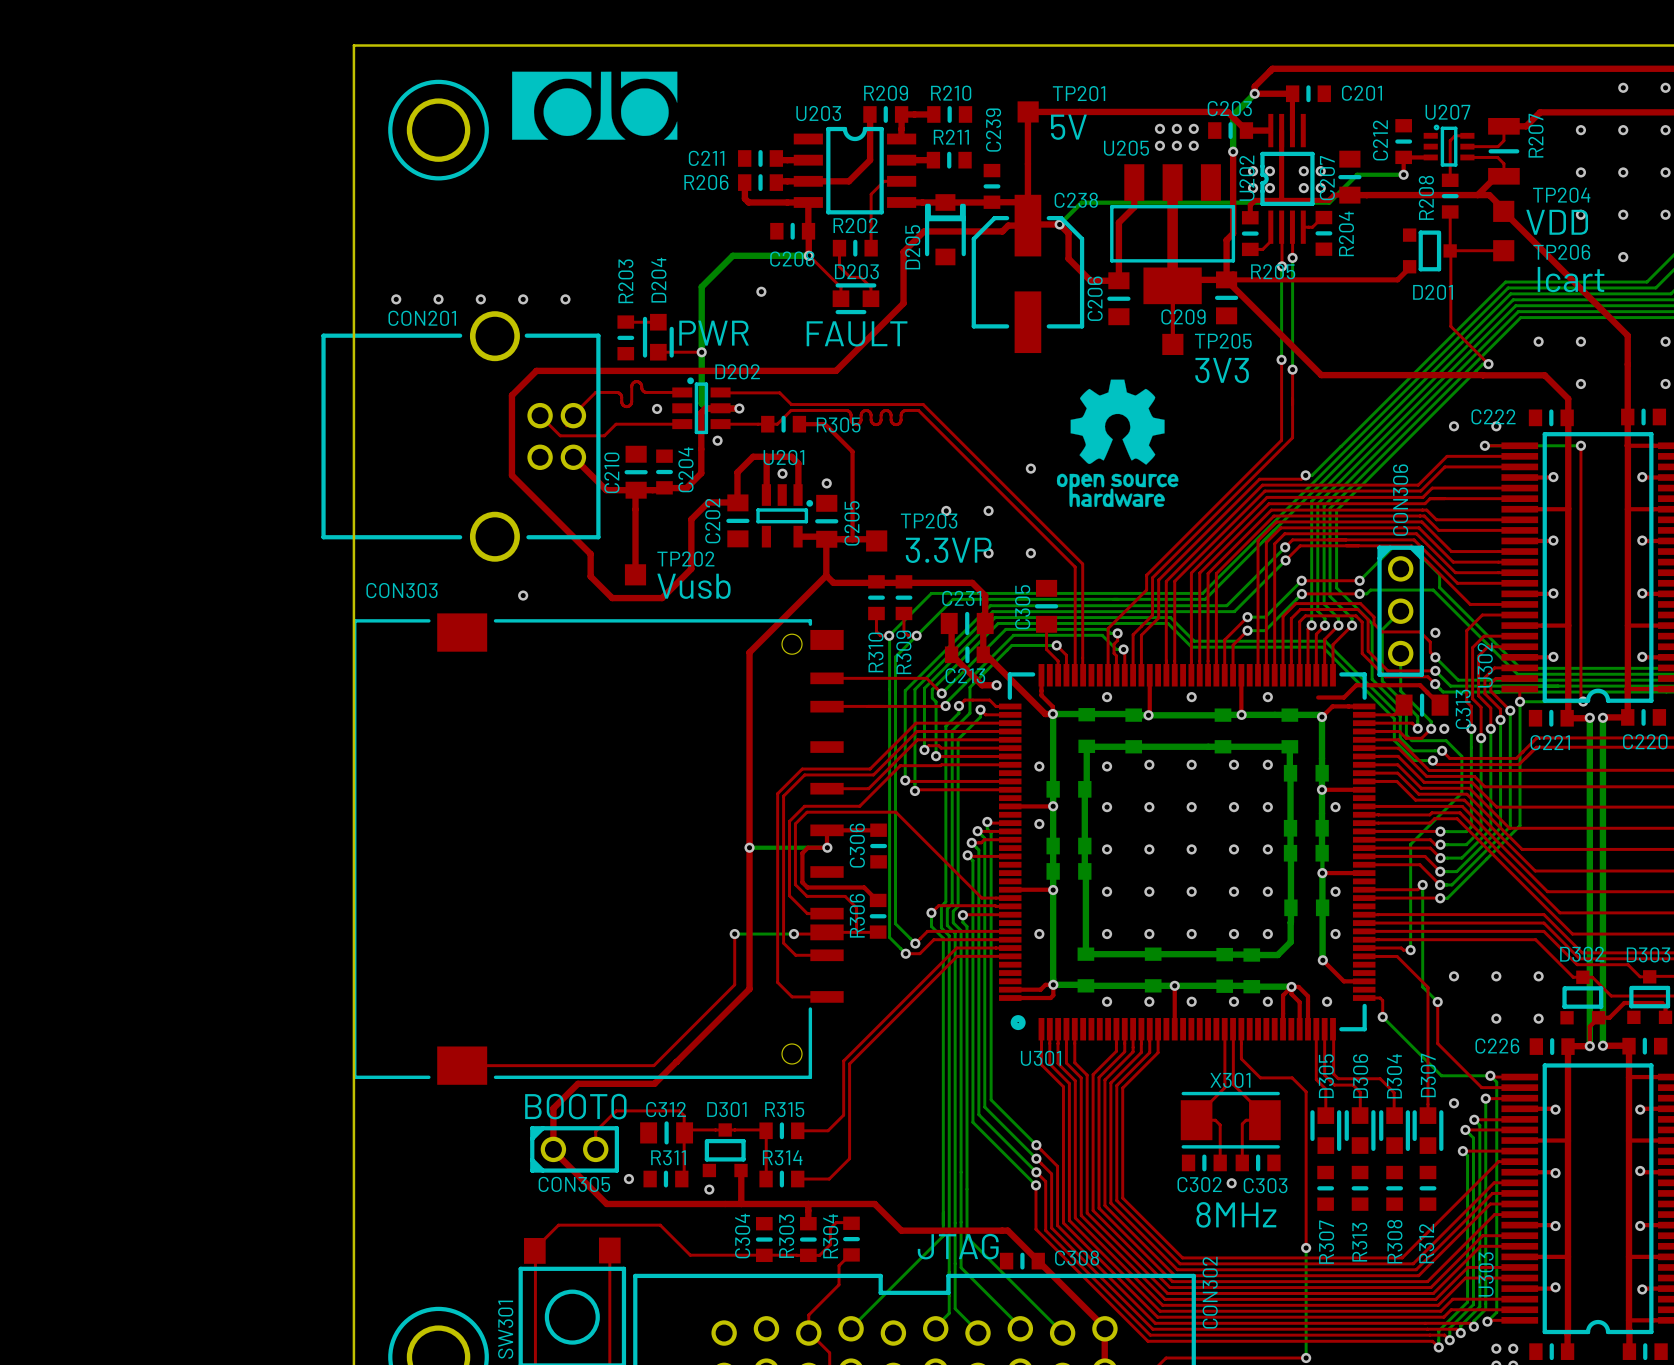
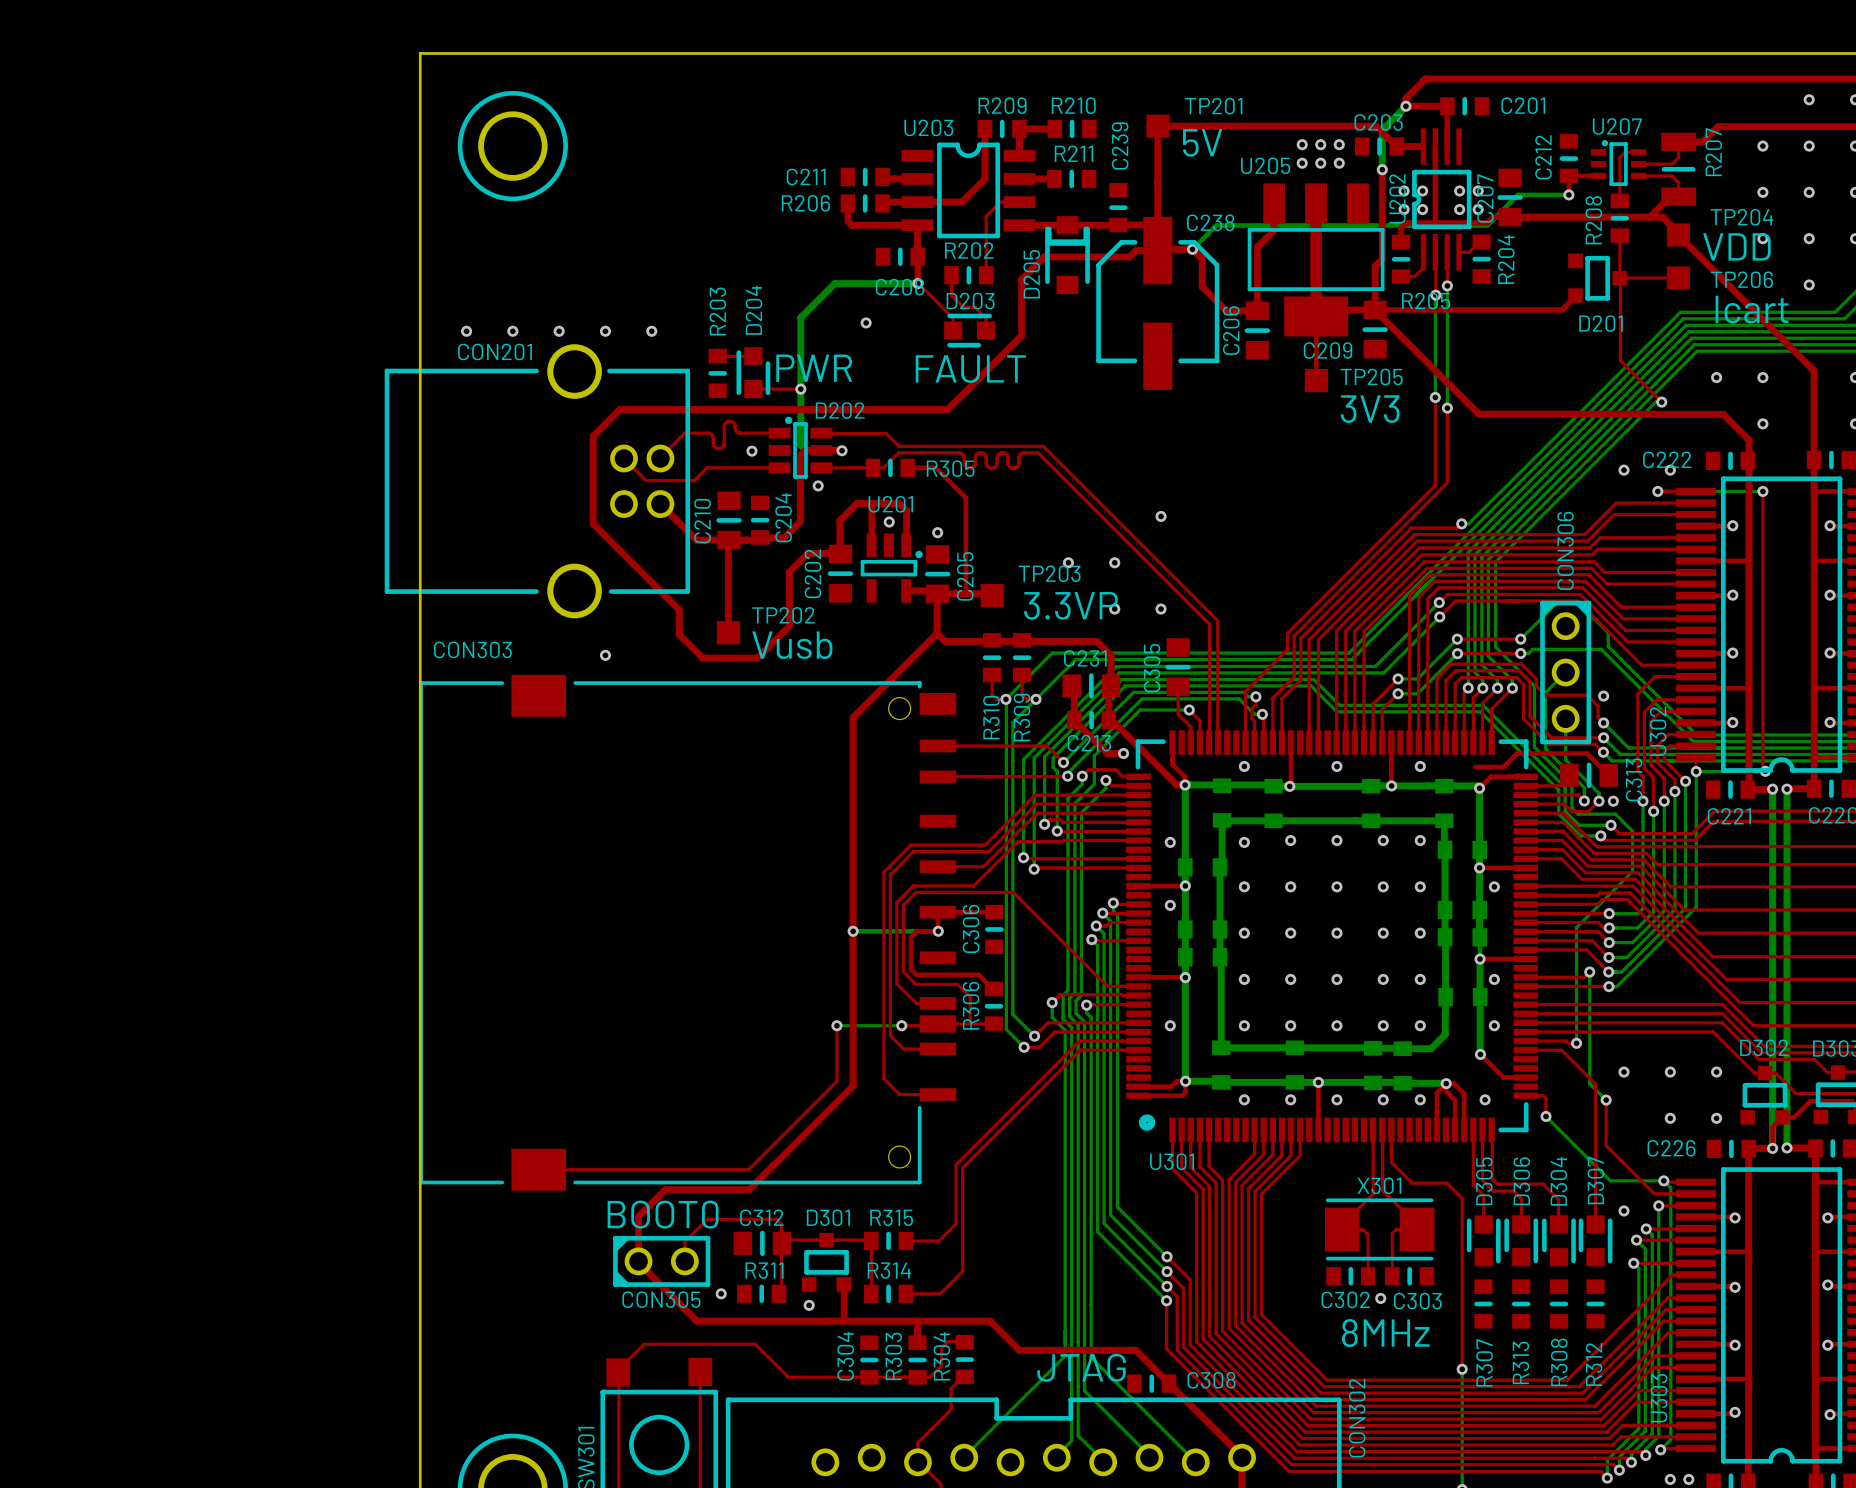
drawing: [512, 71, 678, 140] -> none
drawing: [1056, 379, 1179, 508] -> none

